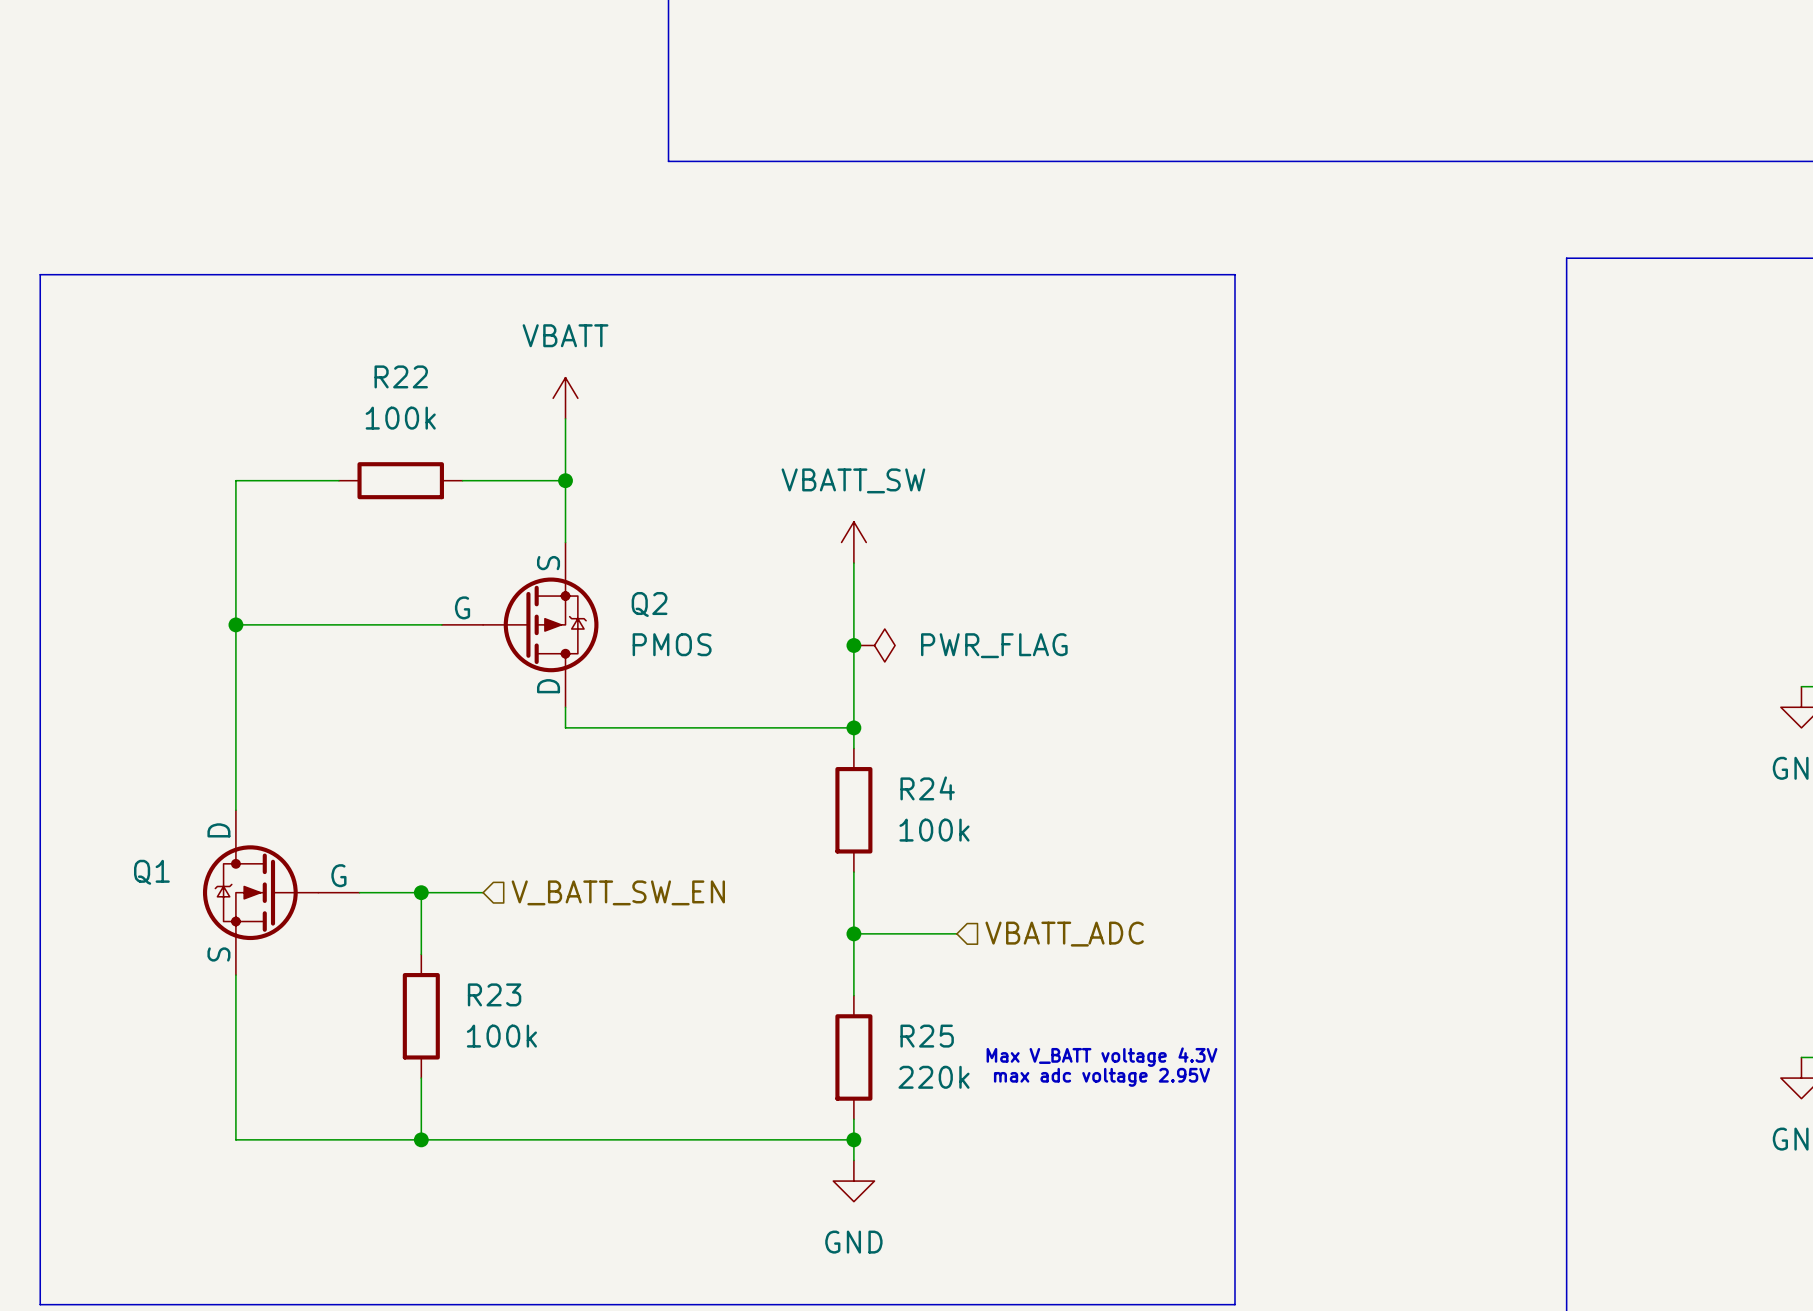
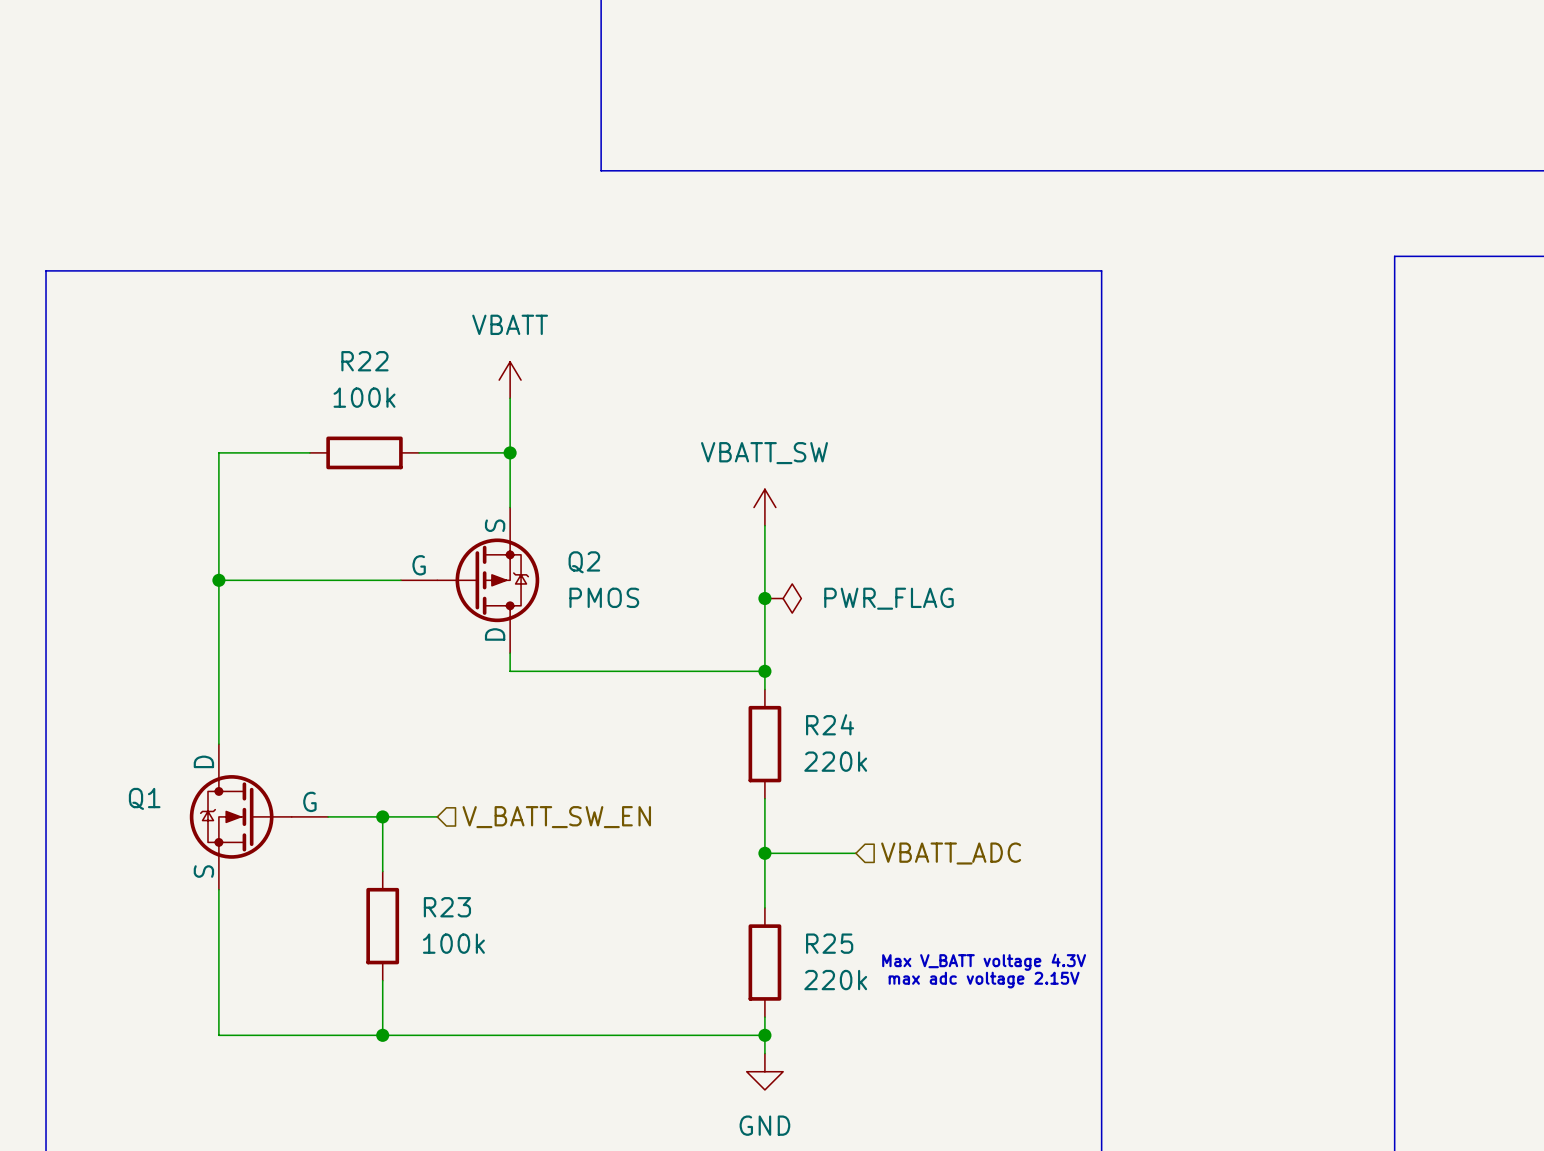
R24 value: 100k (934, 830) -> 220k (835, 761)
text: max adc voltage 2.95V (1101, 1077) -> max adc voltage 2.15V (984, 980)

